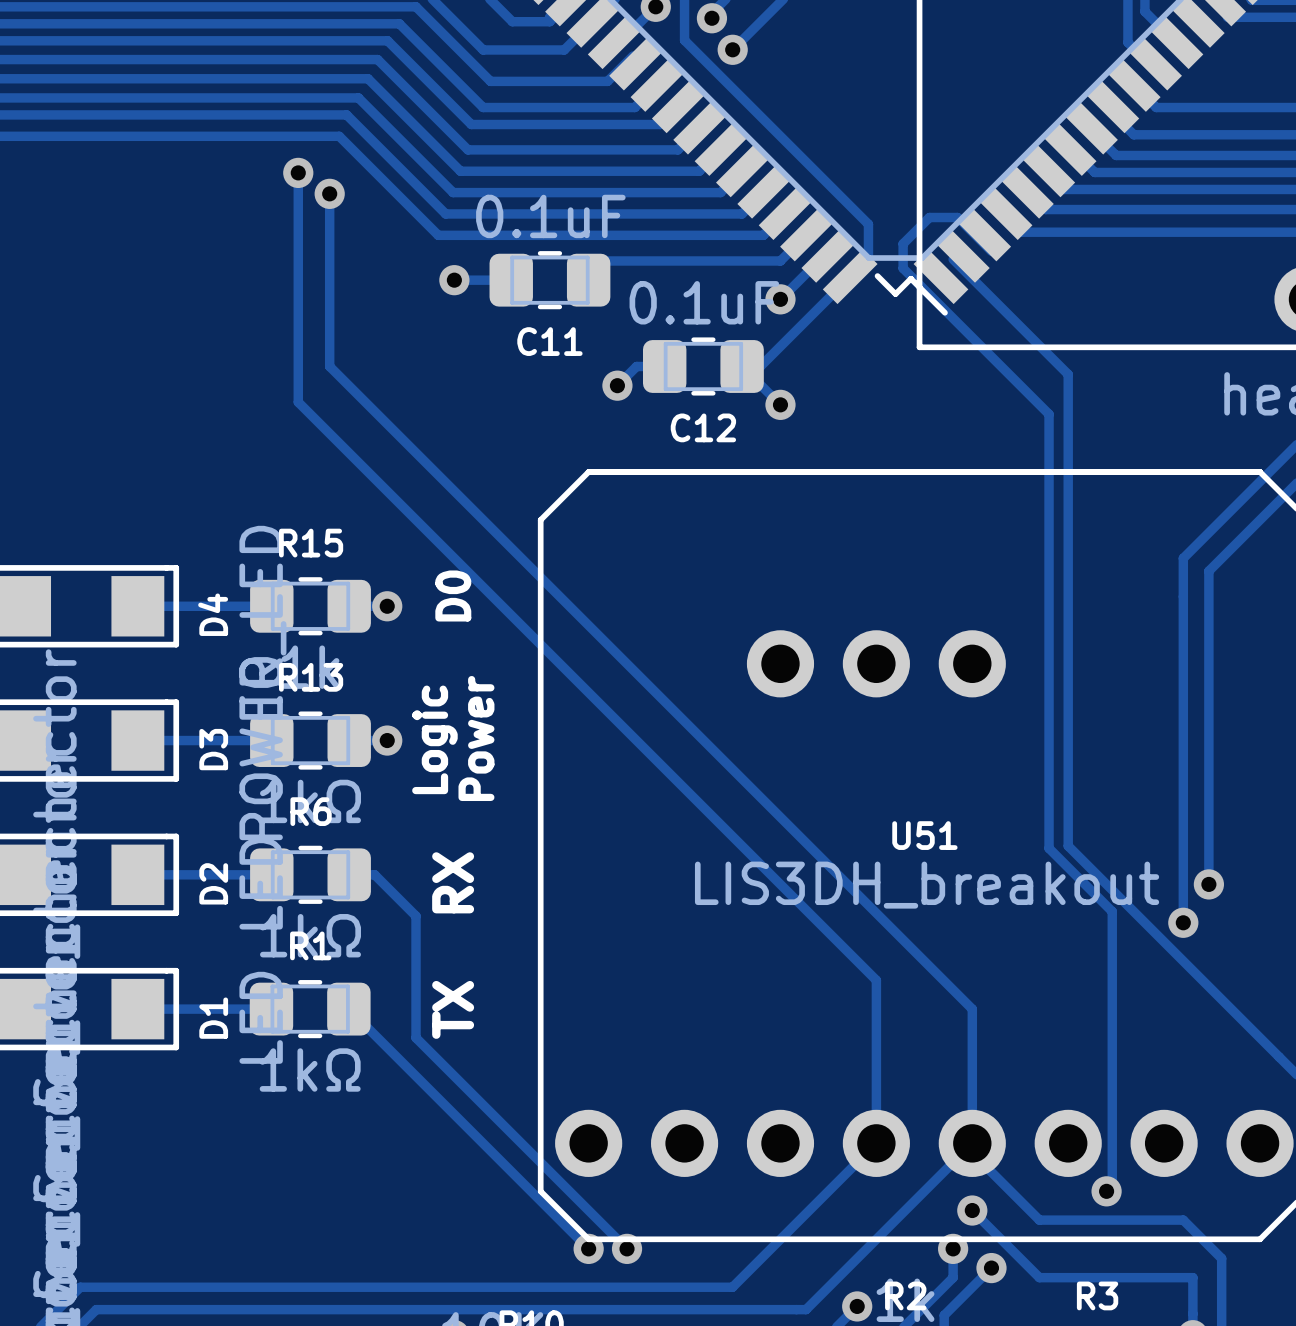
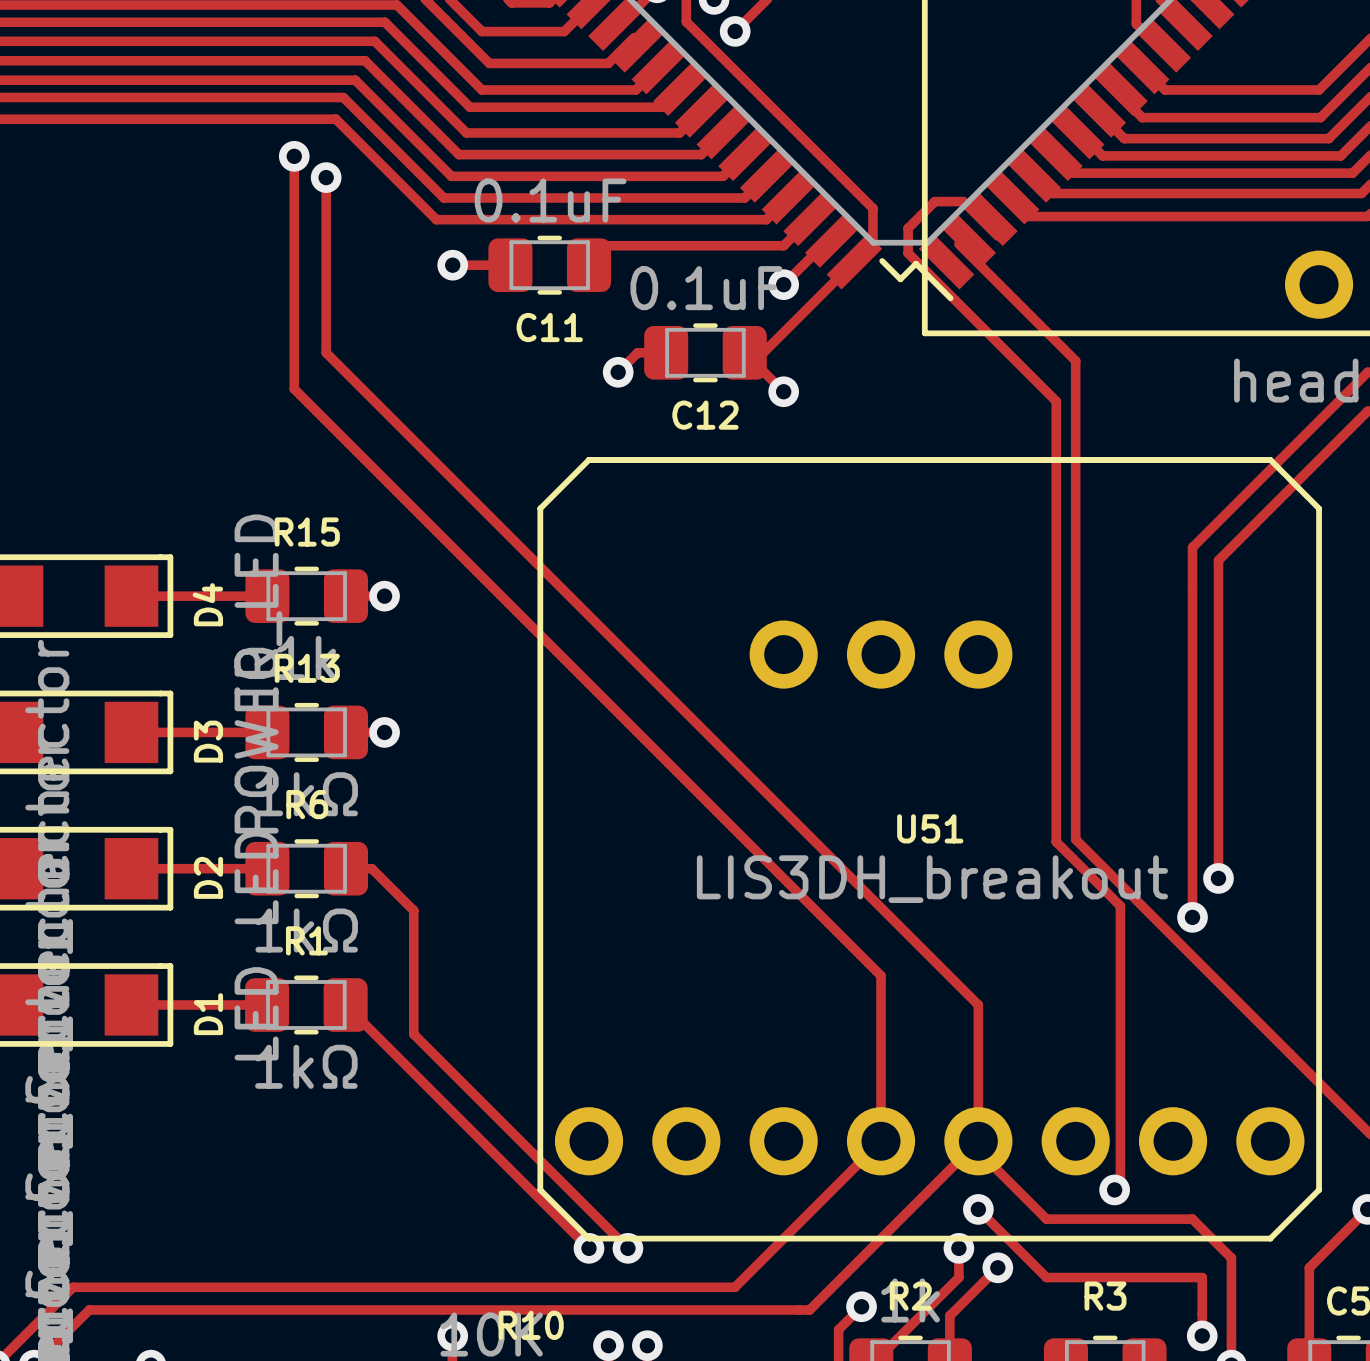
text: D0 (453, 596) -> none
text: Power (476, 738) -> none
text: Logic (434, 739) -> none
text: RX (453, 882) -> none
text: TX (453, 1009) -> none

